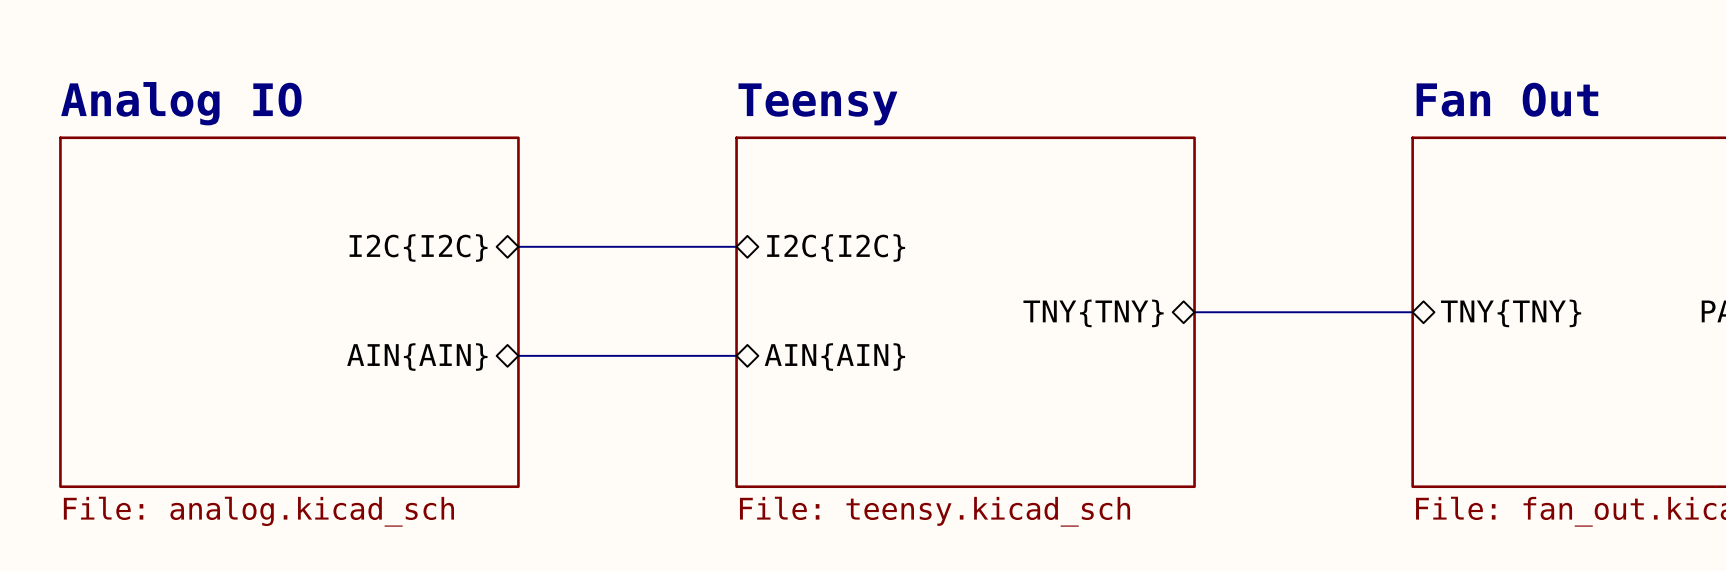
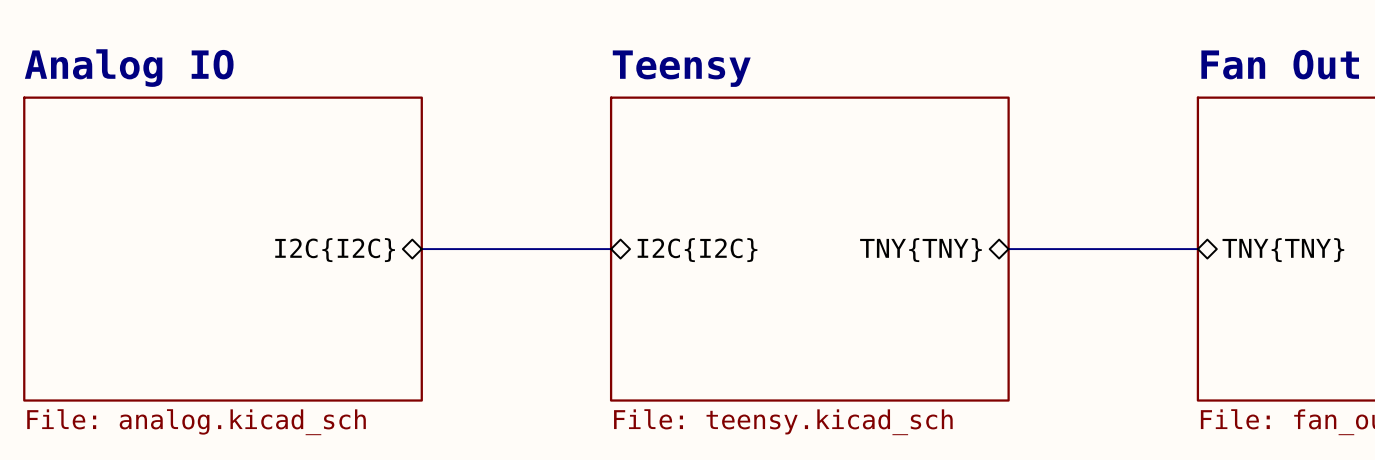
bus: (518, 246) (736, 246) -> none
sheet pin position: I2C{I2C} (418, 247) -> I2C{I2C} (335, 250)
sheet pin position: I2C{I2C} (836, 247) -> I2C{I2C} (697, 250)
bus: (518, 355) (736, 355) -> (421, 249) (611, 249)
sheet pin: AIN{AIN} (417, 357) -> none
sheet pin: AIN{AIN} (834, 357) -> none

